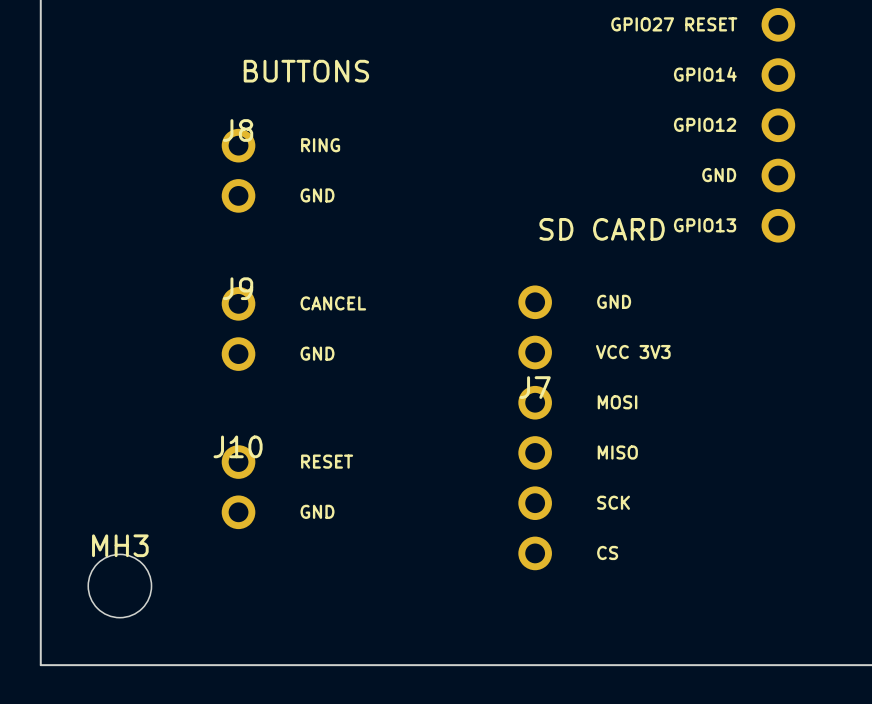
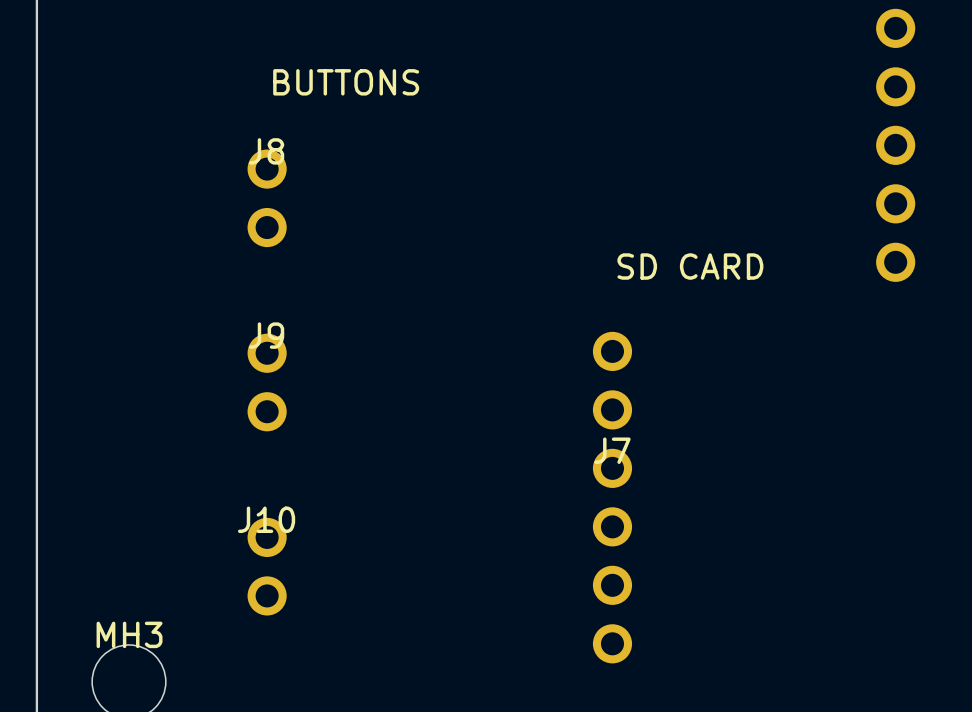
text: GPIO27 RESET (674, 24) -> none
text: GPIO14 (705, 74) -> none
text: GPIO12 (705, 124) -> none
text: RING (320, 145) -> none
text: GND (719, 175) -> none
text: GND (317, 195) -> none
text: GPIO13 (705, 225) -> none
text: GND (614, 301) -> none
text: CANCEL (333, 303) -> none
text: VCC 3V3 (633, 352) -> none
text: GND (317, 353) -> none
text: MOSI (617, 402) -> none
text: MISO (617, 452) -> none
text: RESET (327, 461) -> none
text: SCK (613, 502) -> none
text: GND (317, 511) -> none
text: CS (607, 552) -> none

